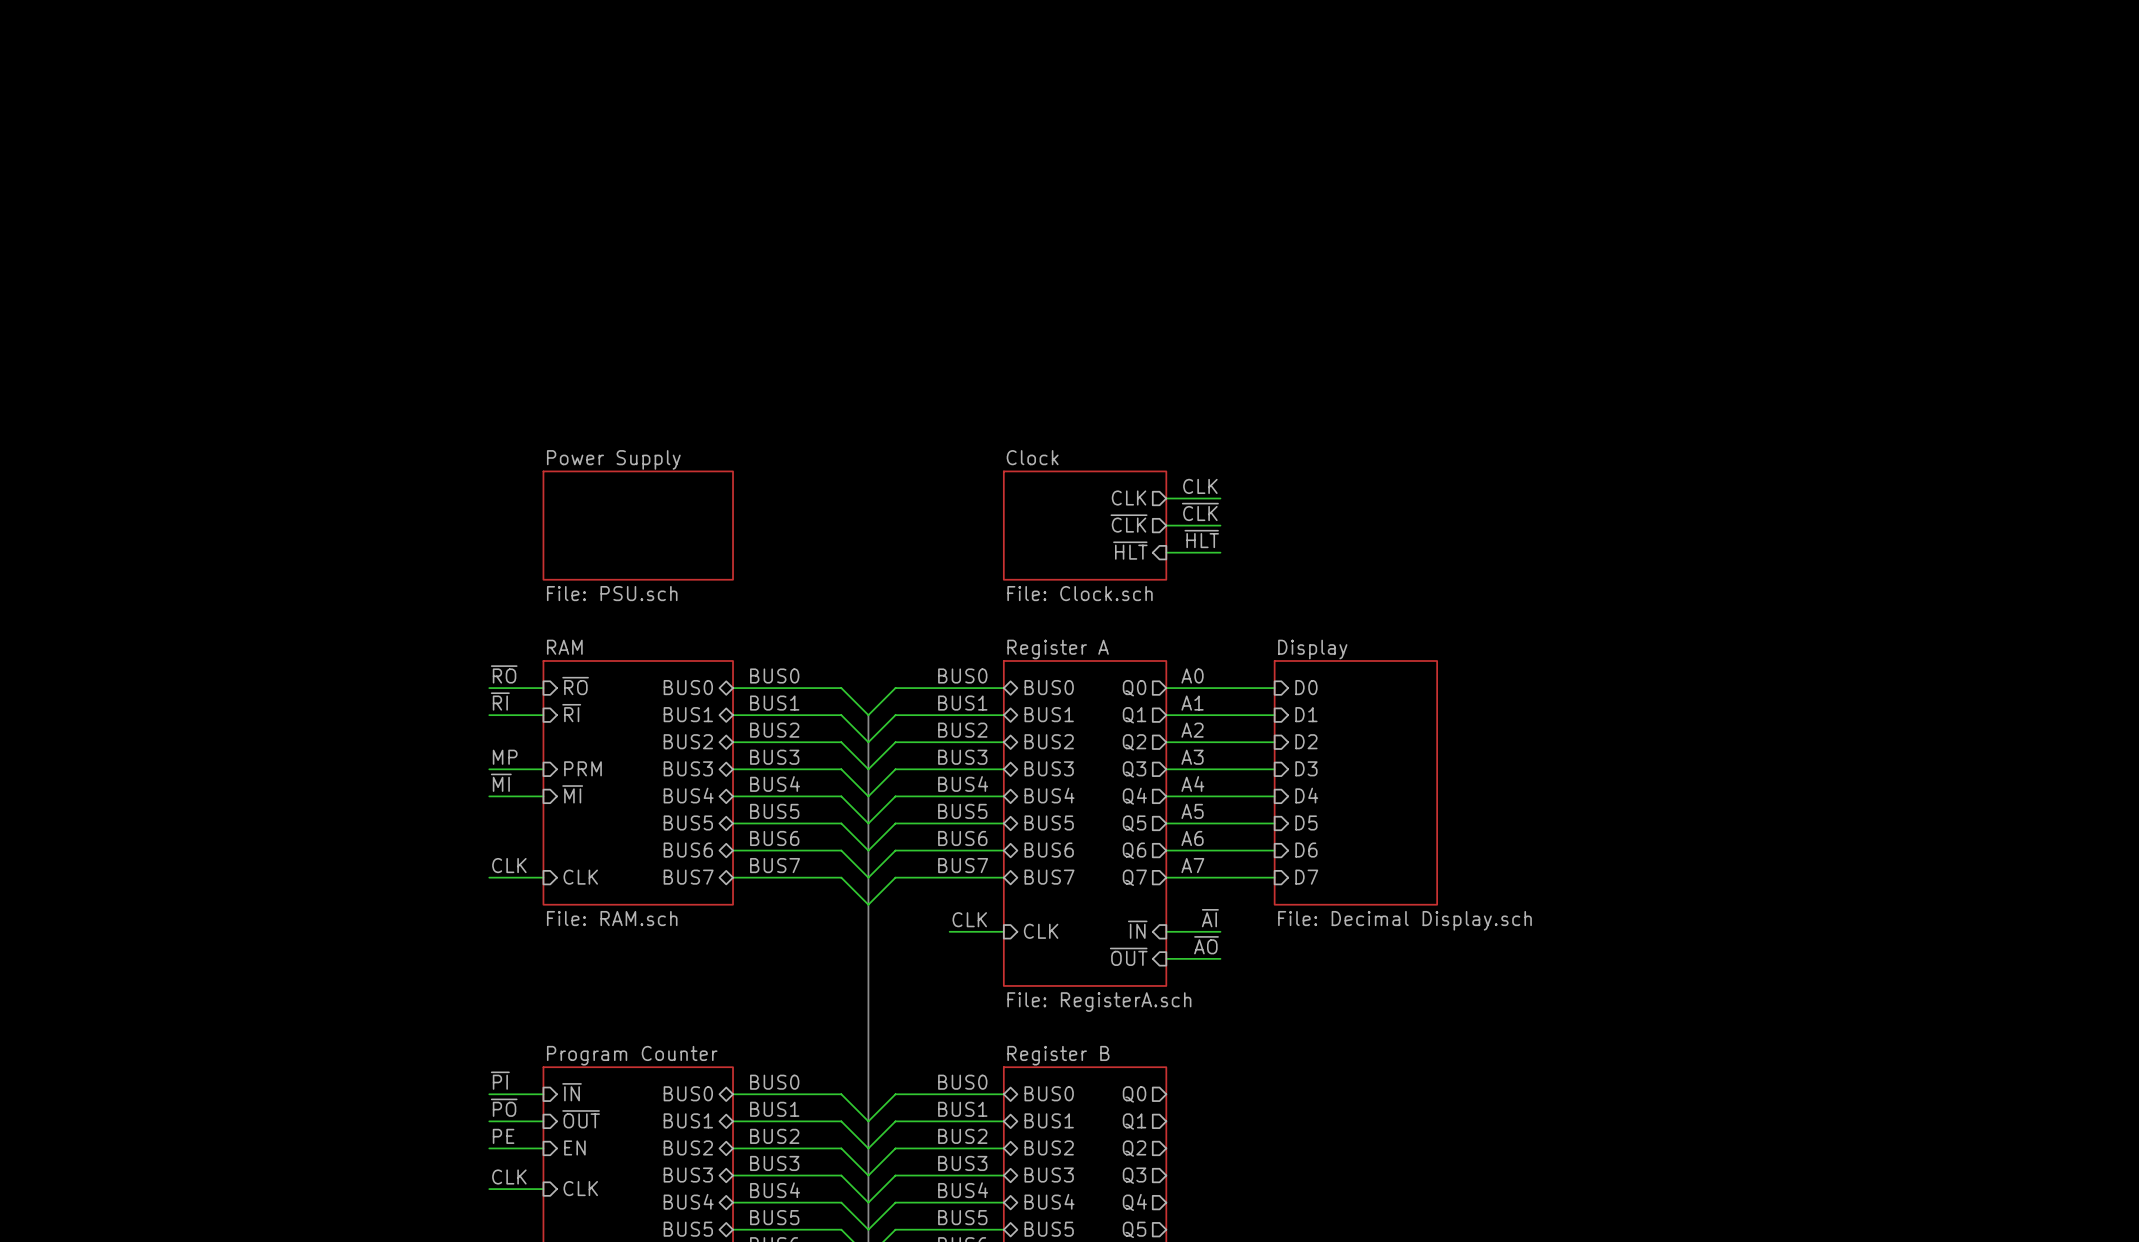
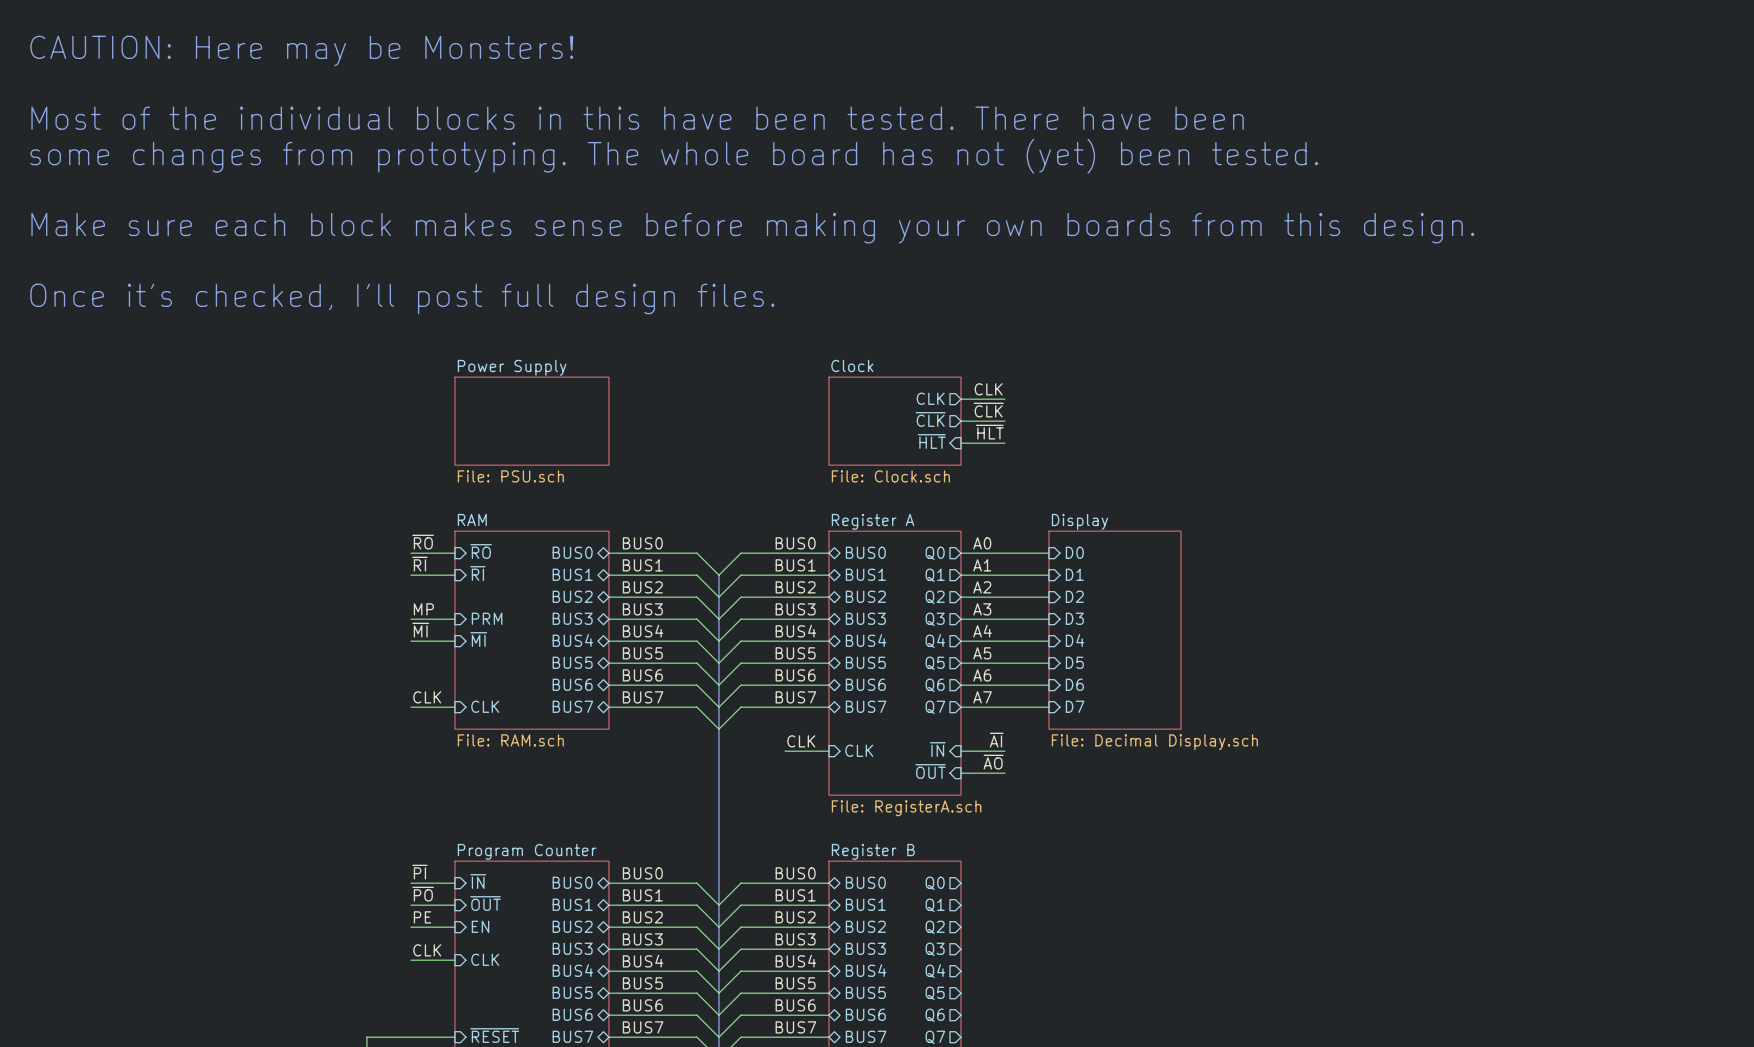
text: none -> CAUTION: Here may be Monsters! (301, 51)
text: none -> Most of the individual blocks in this have been tested. There have been (637, 118)
text: none -> some changes from prototyping. The whole board has not (yet) been tested. (674, 156)
text: none -> Make sure each block makes sense before making your own boards from this design. (752, 228)
text: none -> Once it's checked, I'll post full design files. (402, 298)

